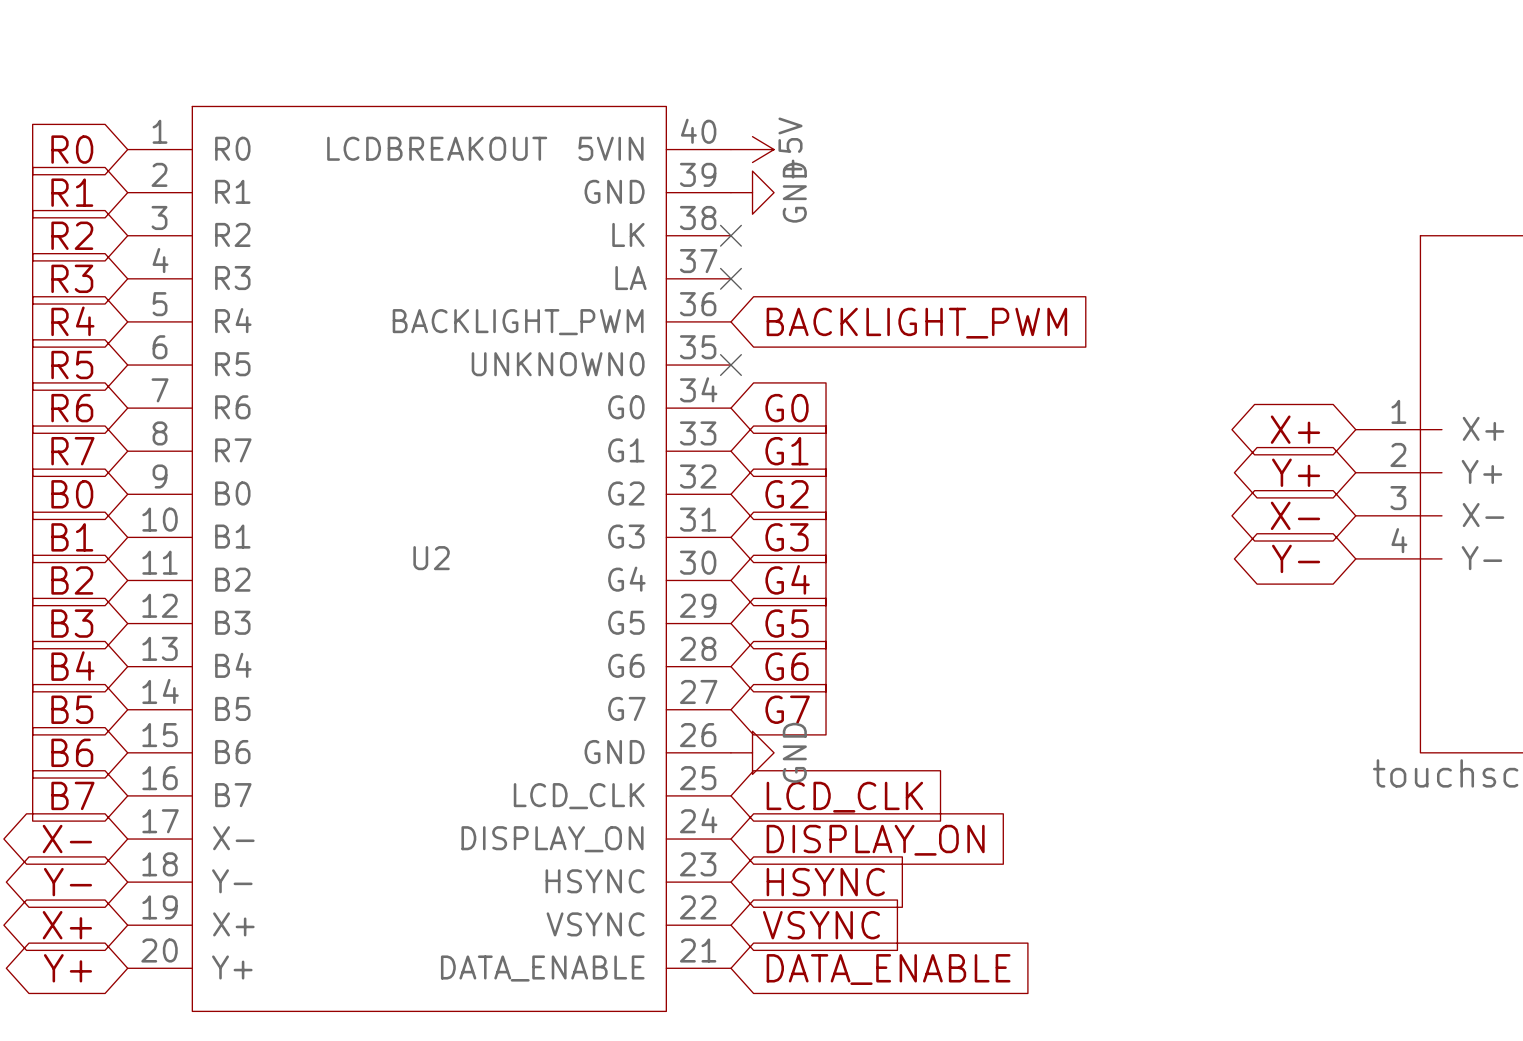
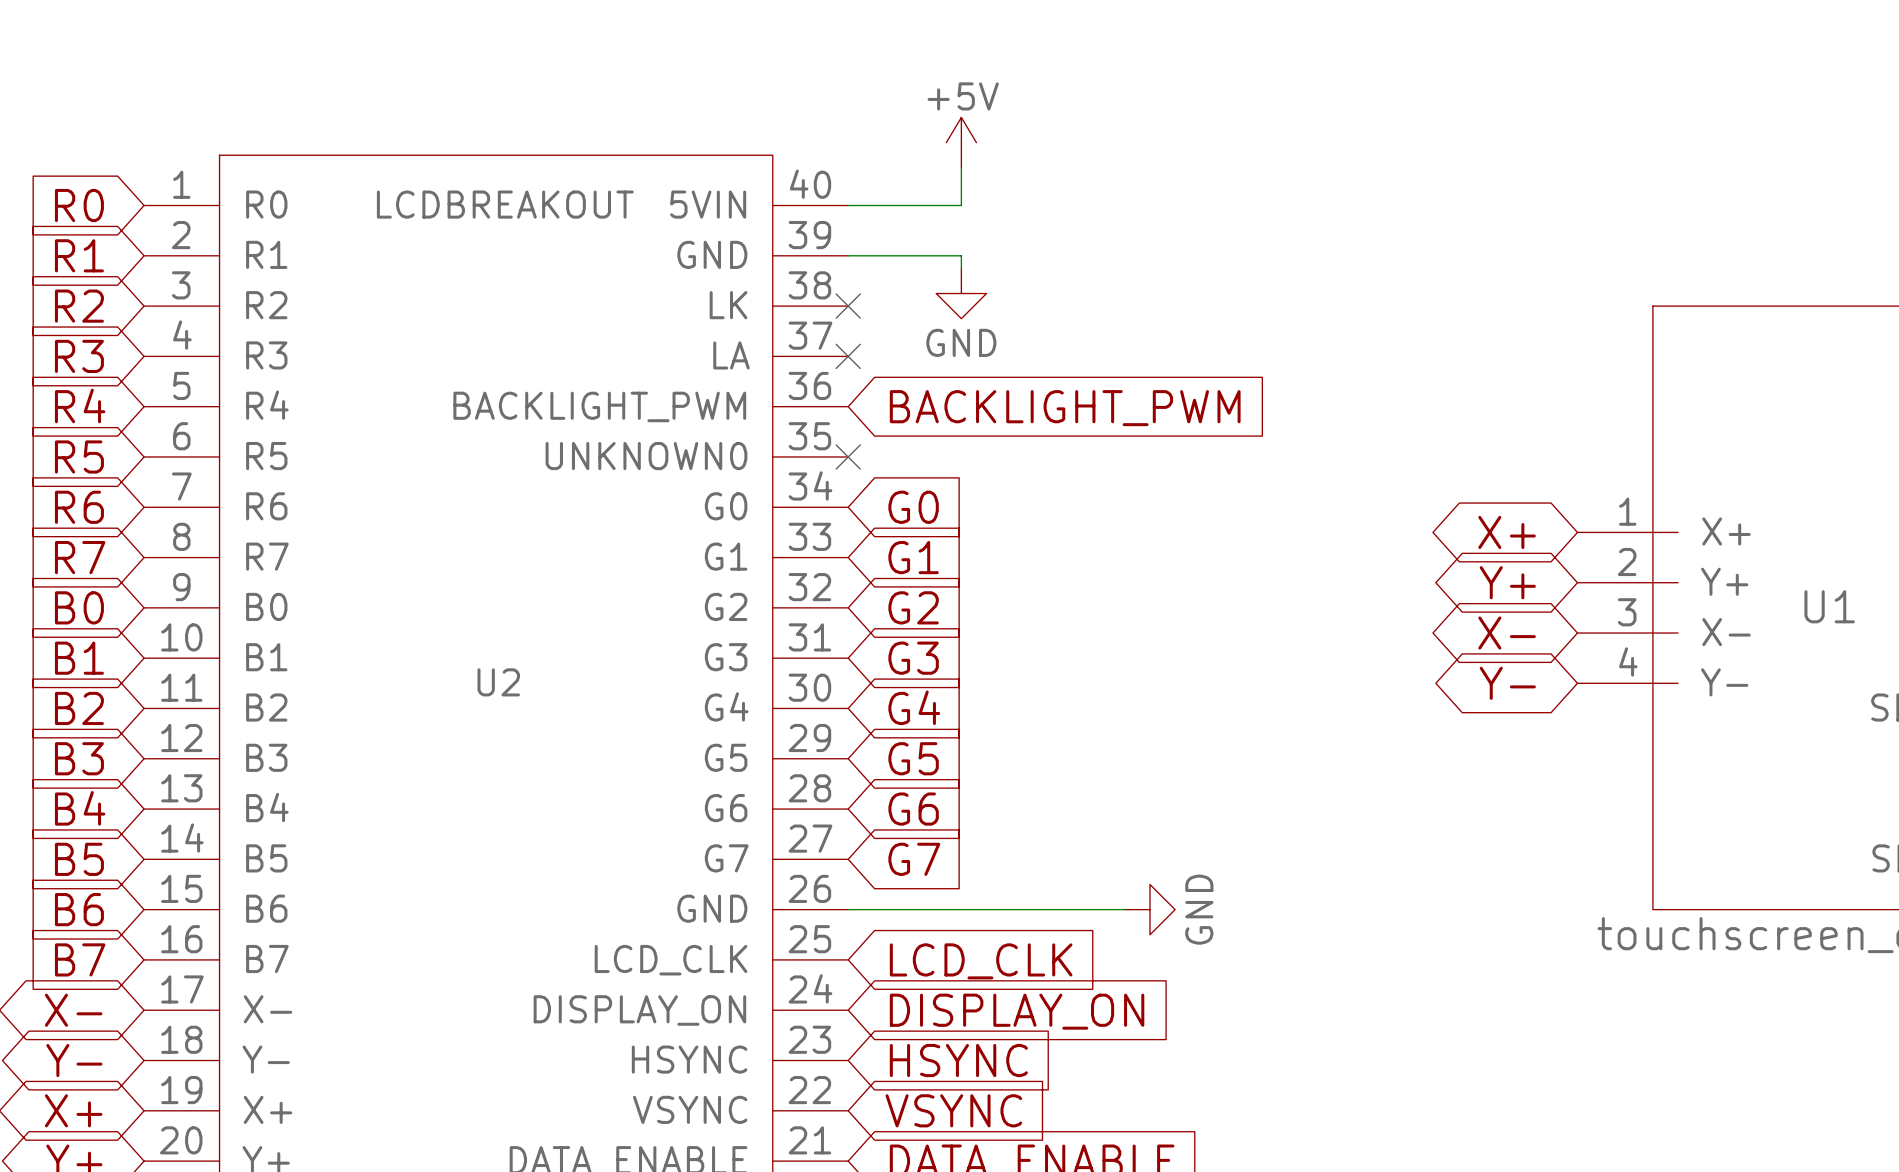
wire: none -> (961, 167) (961, 205) (848, 205)
power symbol rotation: 0° (752, 149) -> 90° counterclockwise (961, 142)
power symbol position: +5V (752, 149) -> +5V (961, 142)
wire: none -> (848, 255) (961, 255) (961, 268)
power symbol rotation: 0° (752, 192) -> 90° clockwise (961, 293)
power symbol position: GND (752, 192) -> GND (961, 293)
wire: none -> (848, 909) (1124, 909)
power symbol position: GND (752, 752) -> GND (1149, 909)

